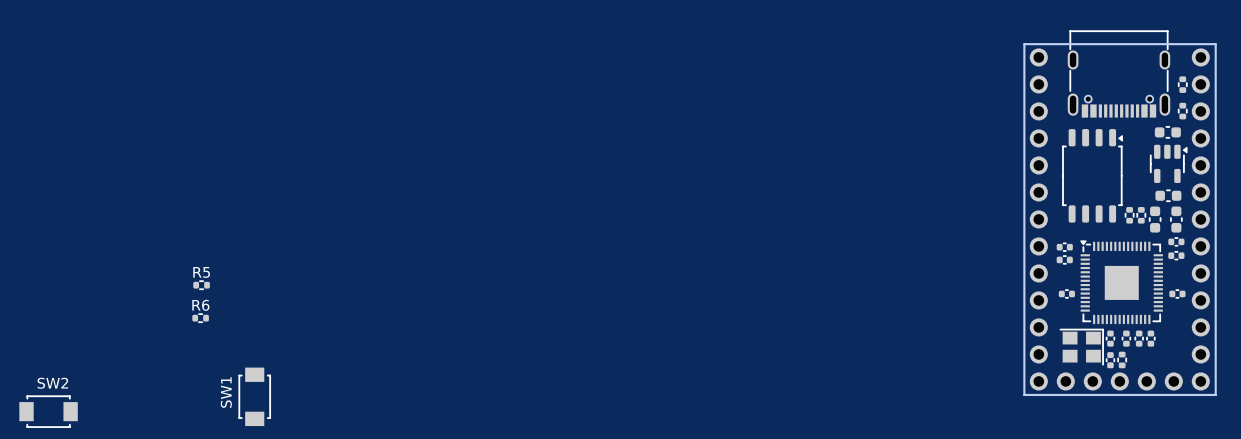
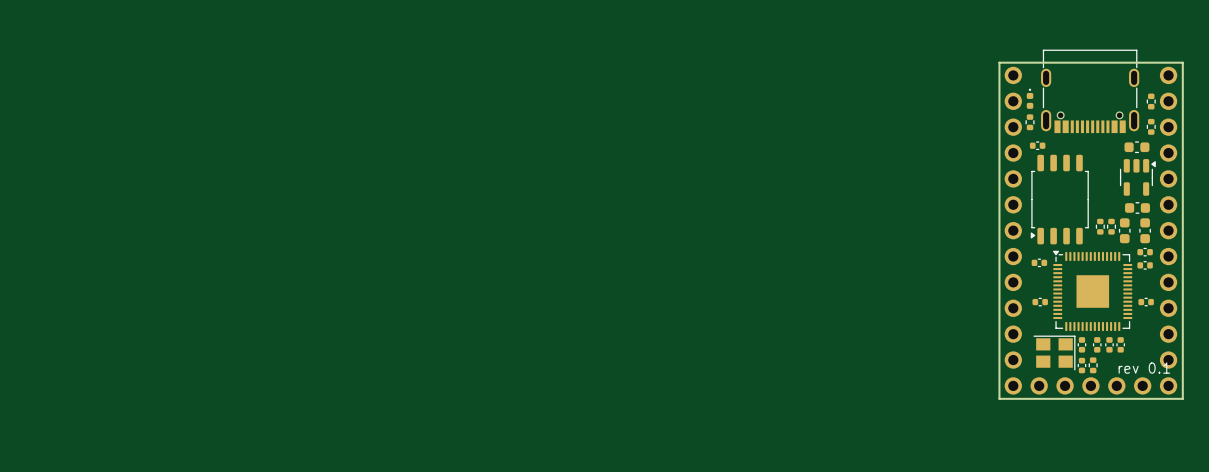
part: none -> (1030, 98)
part: none -> (1030, 122)
part: none -> (1037, 145)
part rotation: 0° (1092, 175) -> 180° (1059, 199)
part: (1064, 247) -> none
part: none -> (1039, 262)
part: (1064, 259) -> none
R5: (201, 285) -> none
R6: (200, 318) -> none
text: none -> rev 0.1 (1144, 368)
SW1: (254, 396) -> none
SW2: (48, 411) -> none

